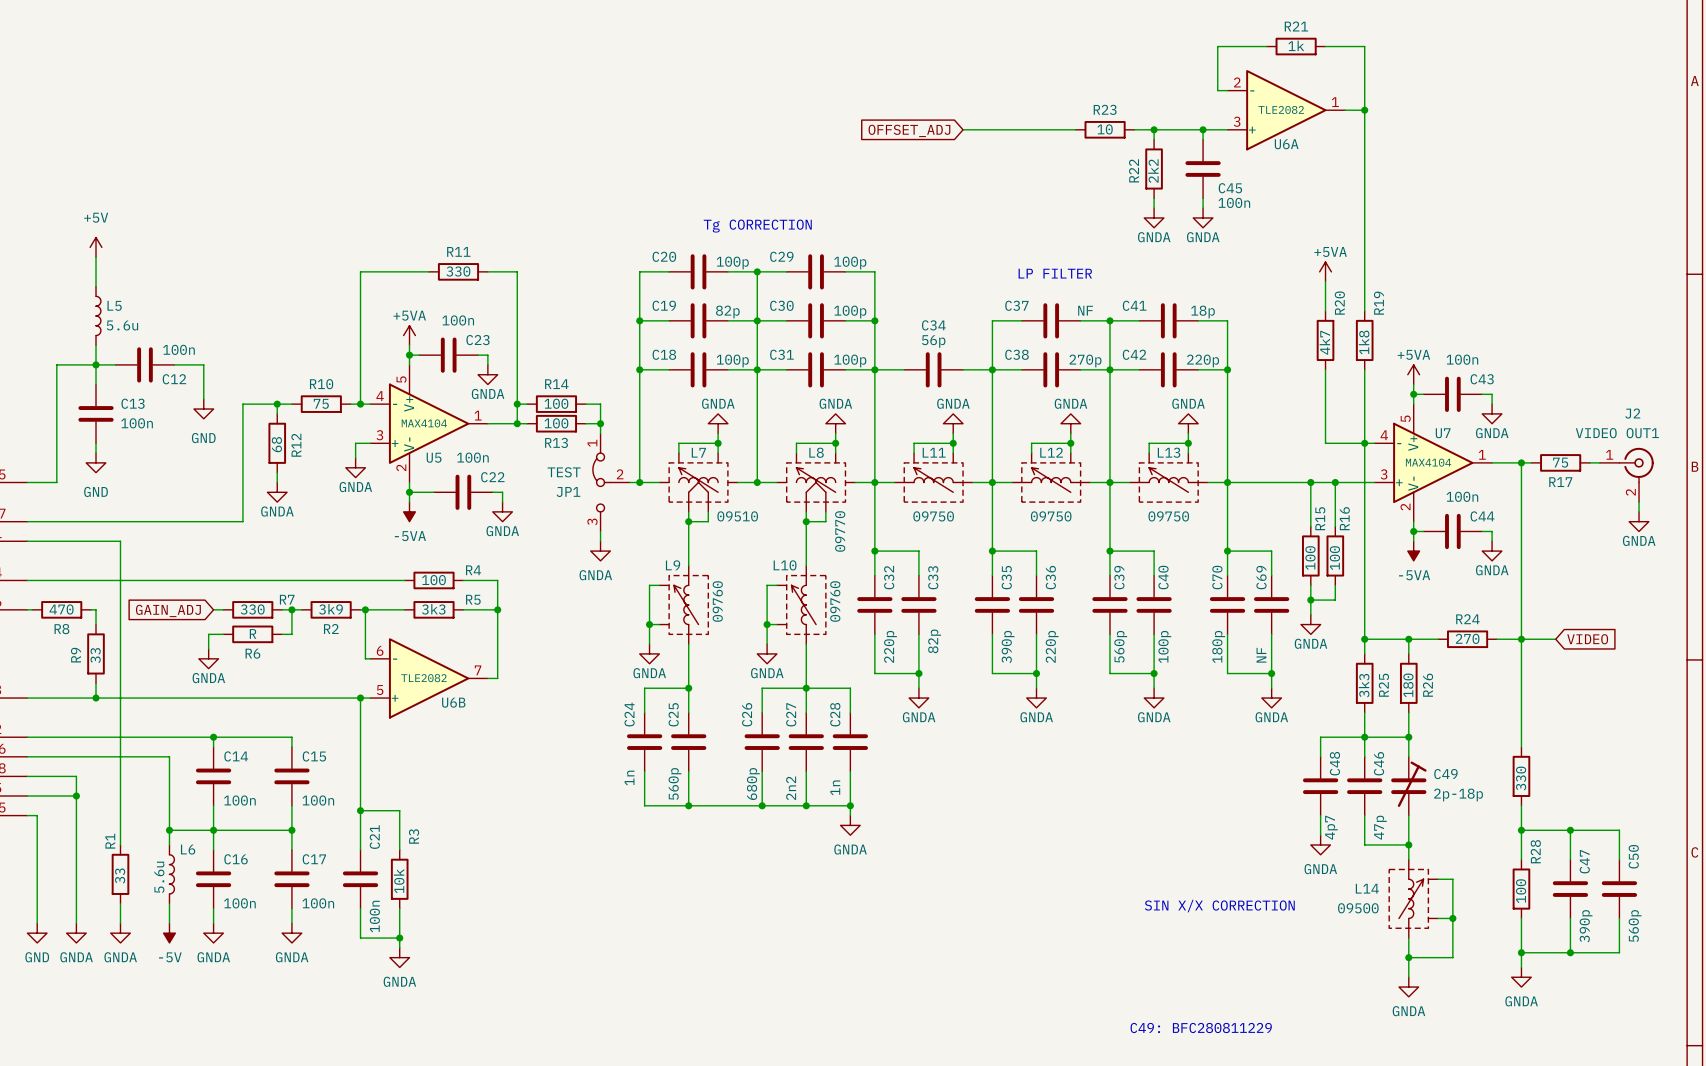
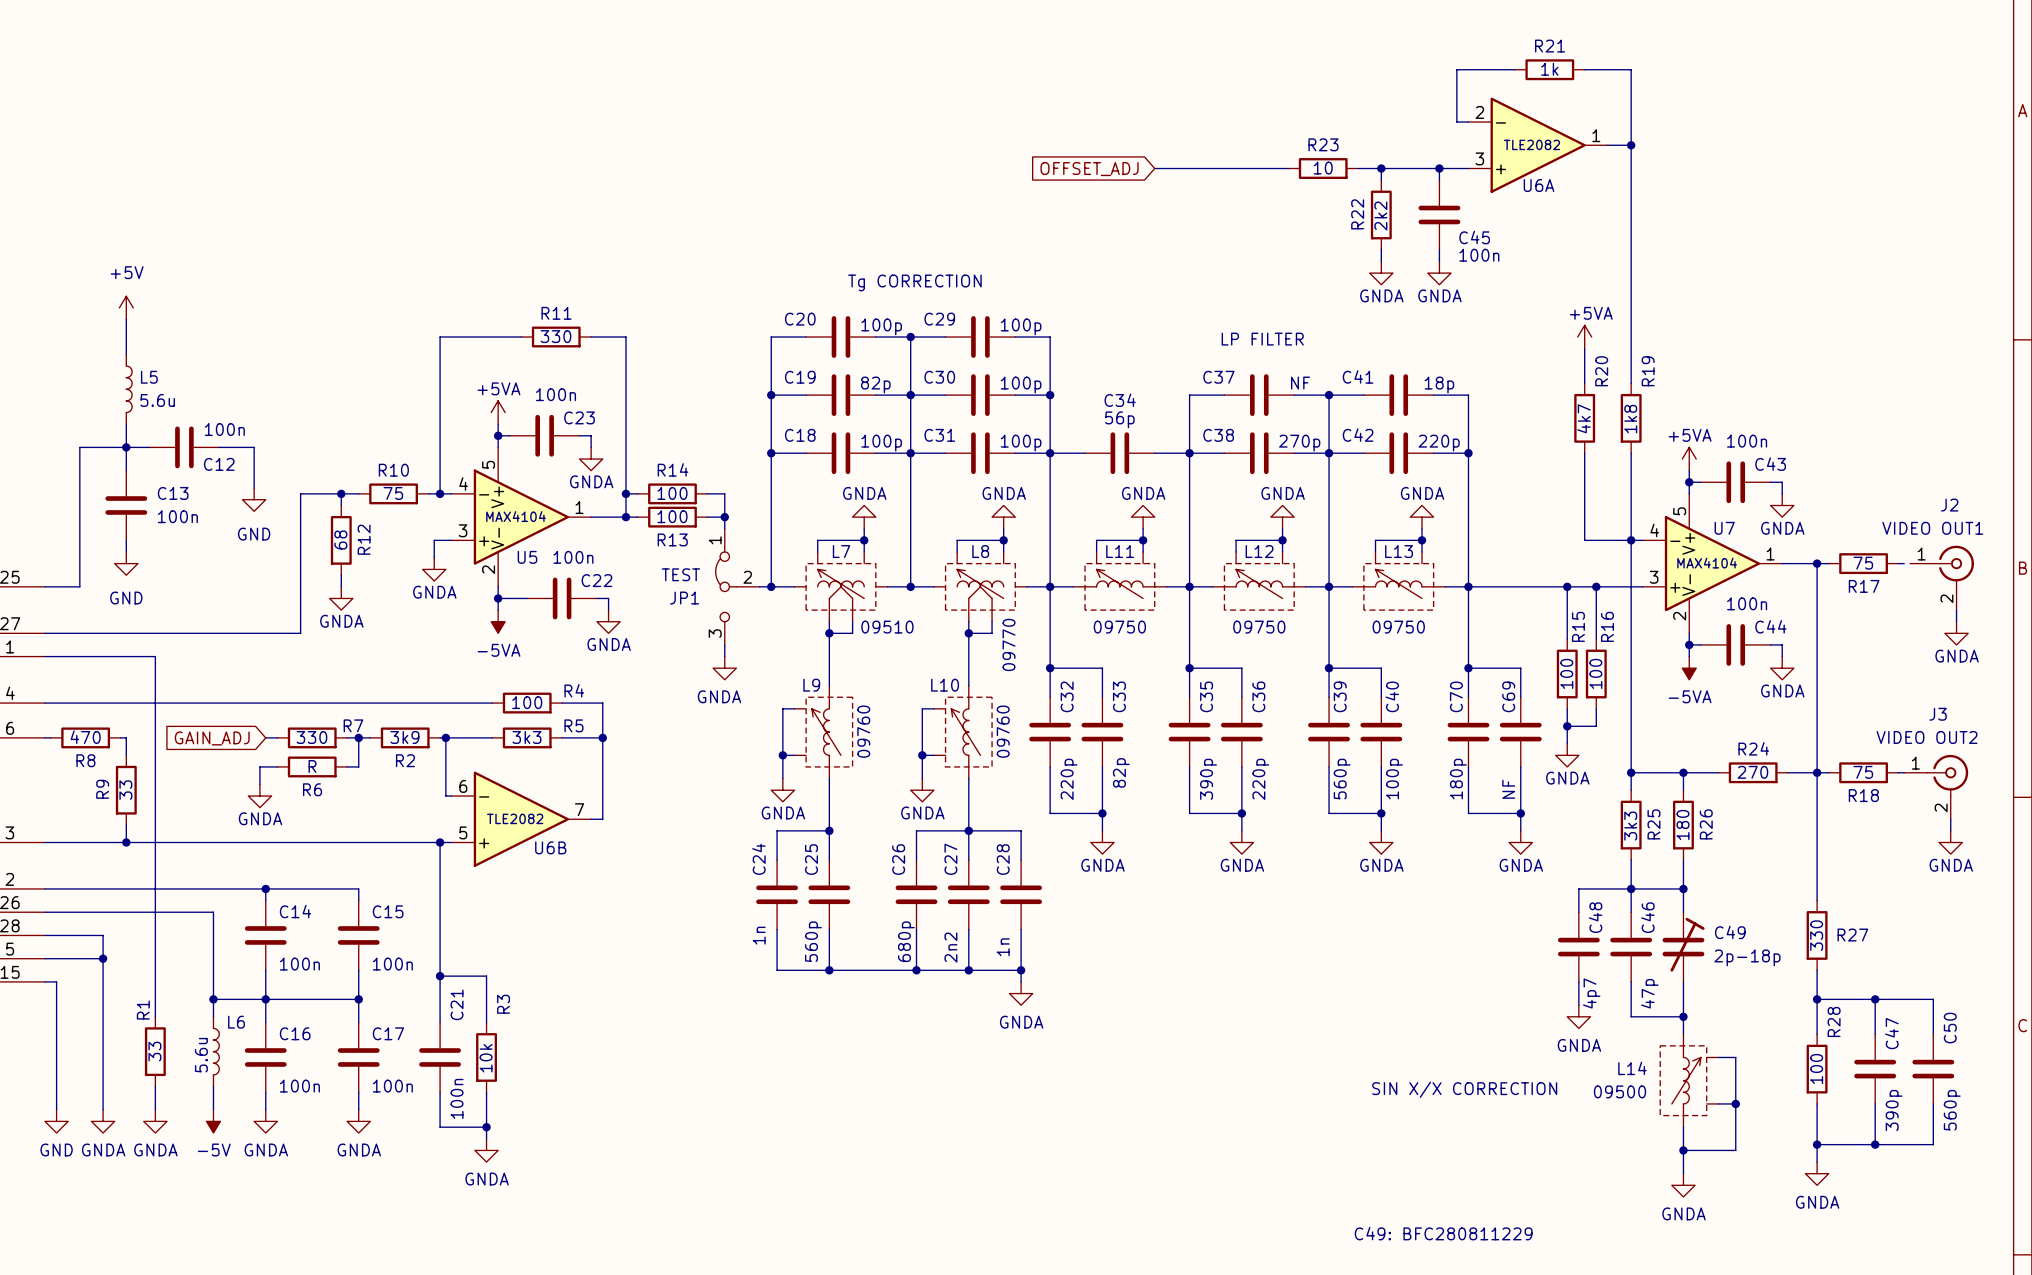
wire: (1594, 462) (1599, 462) -> (1898, 772) (1904, 772)
wire: (1531, 639) (1555, 639) -> none
R18: none -> 75 (1863, 772)
global label: VIDEO (1587, 639) -> none
J3: none -> VIDEO OUT2 (1936, 787)
wire: none -> (1950, 819) (1950, 830)
power symbol: none -> GNDA (1950, 842)
R27 name: none -> R27 (1852, 935)

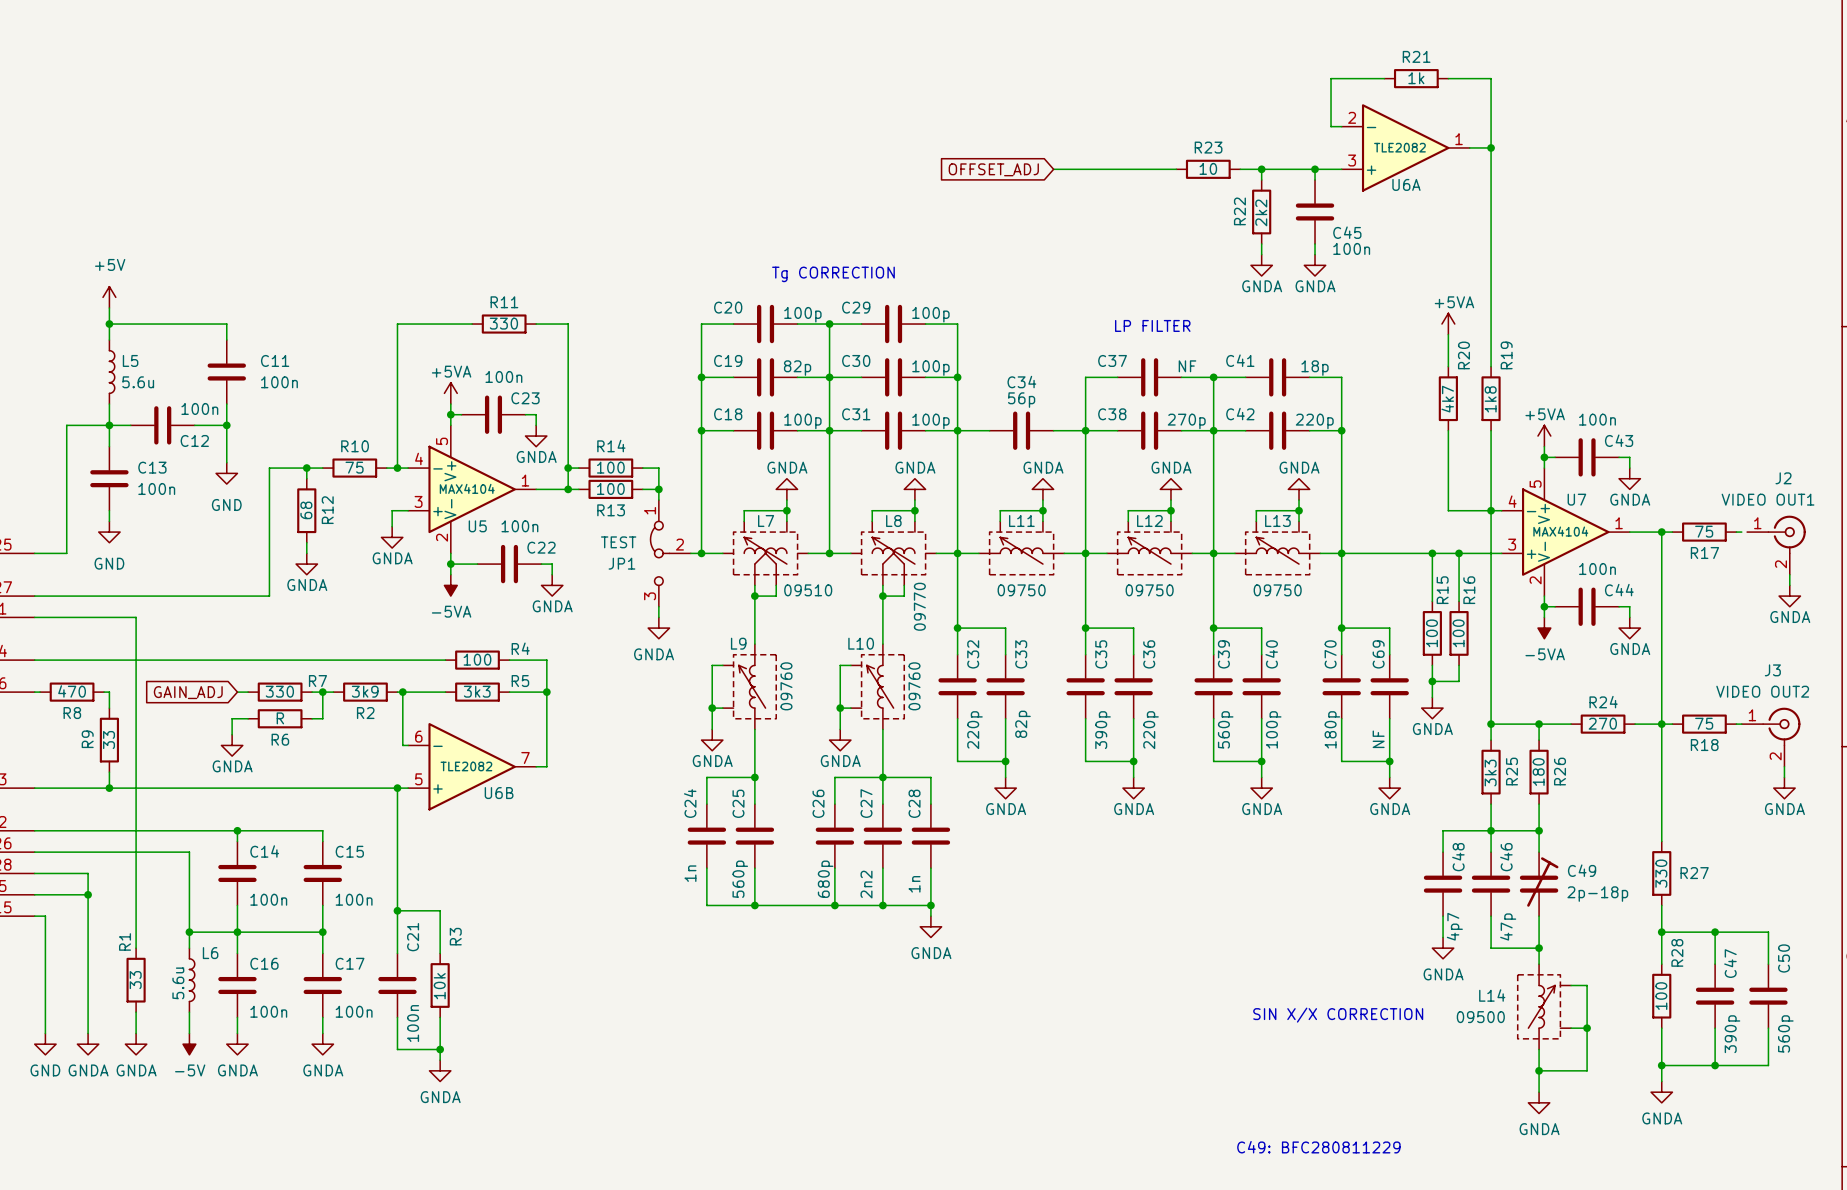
wire: none -> (109, 324) (226, 324) (226, 340)
junction: none -> (109, 324)
C11: none -> 100n (226, 372)
wire: none -> (226, 404) (226, 425)
junction: none -> (226, 425)

